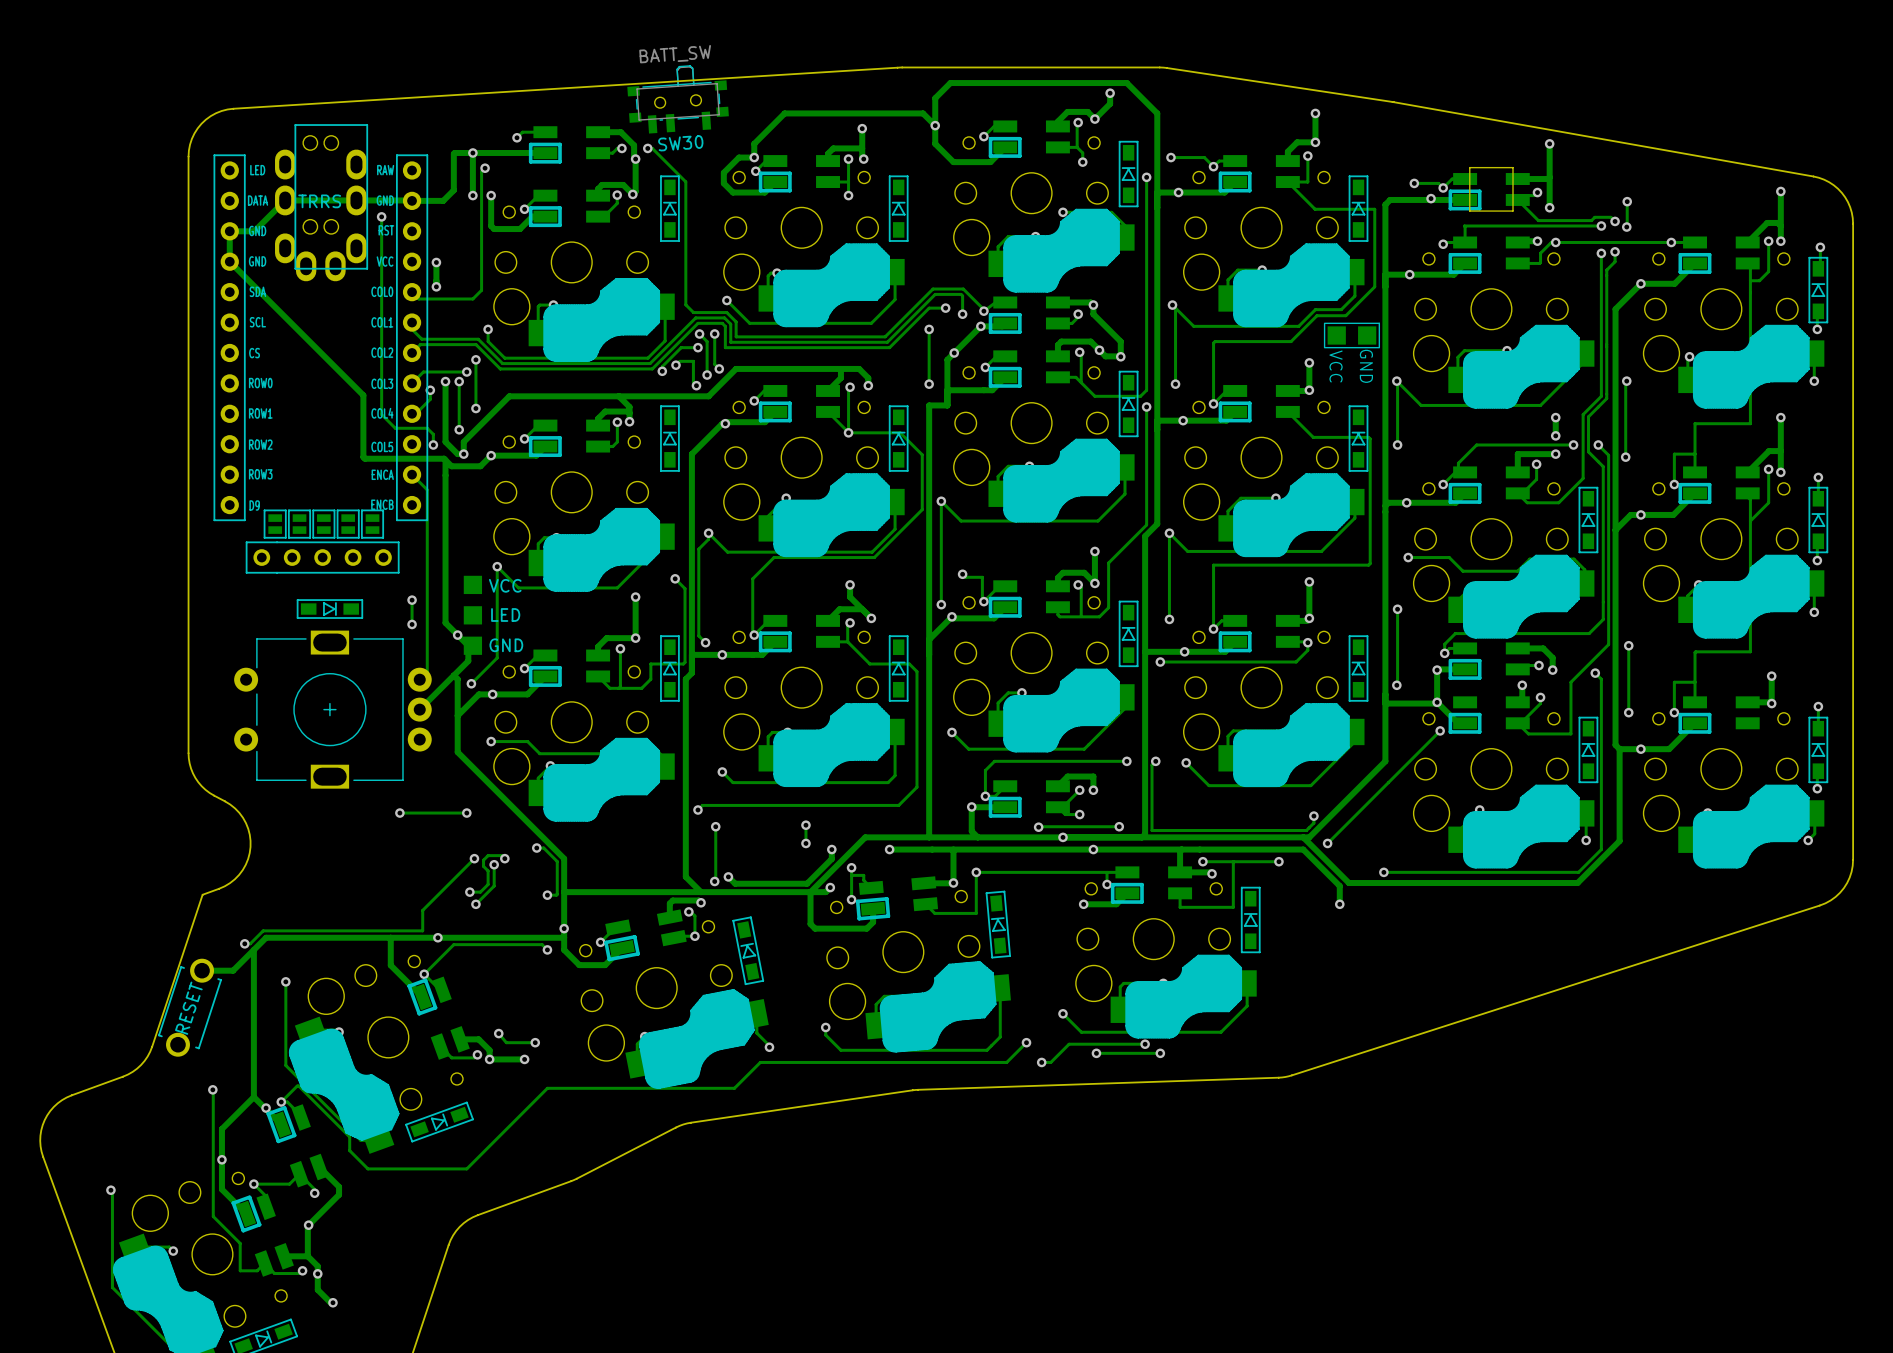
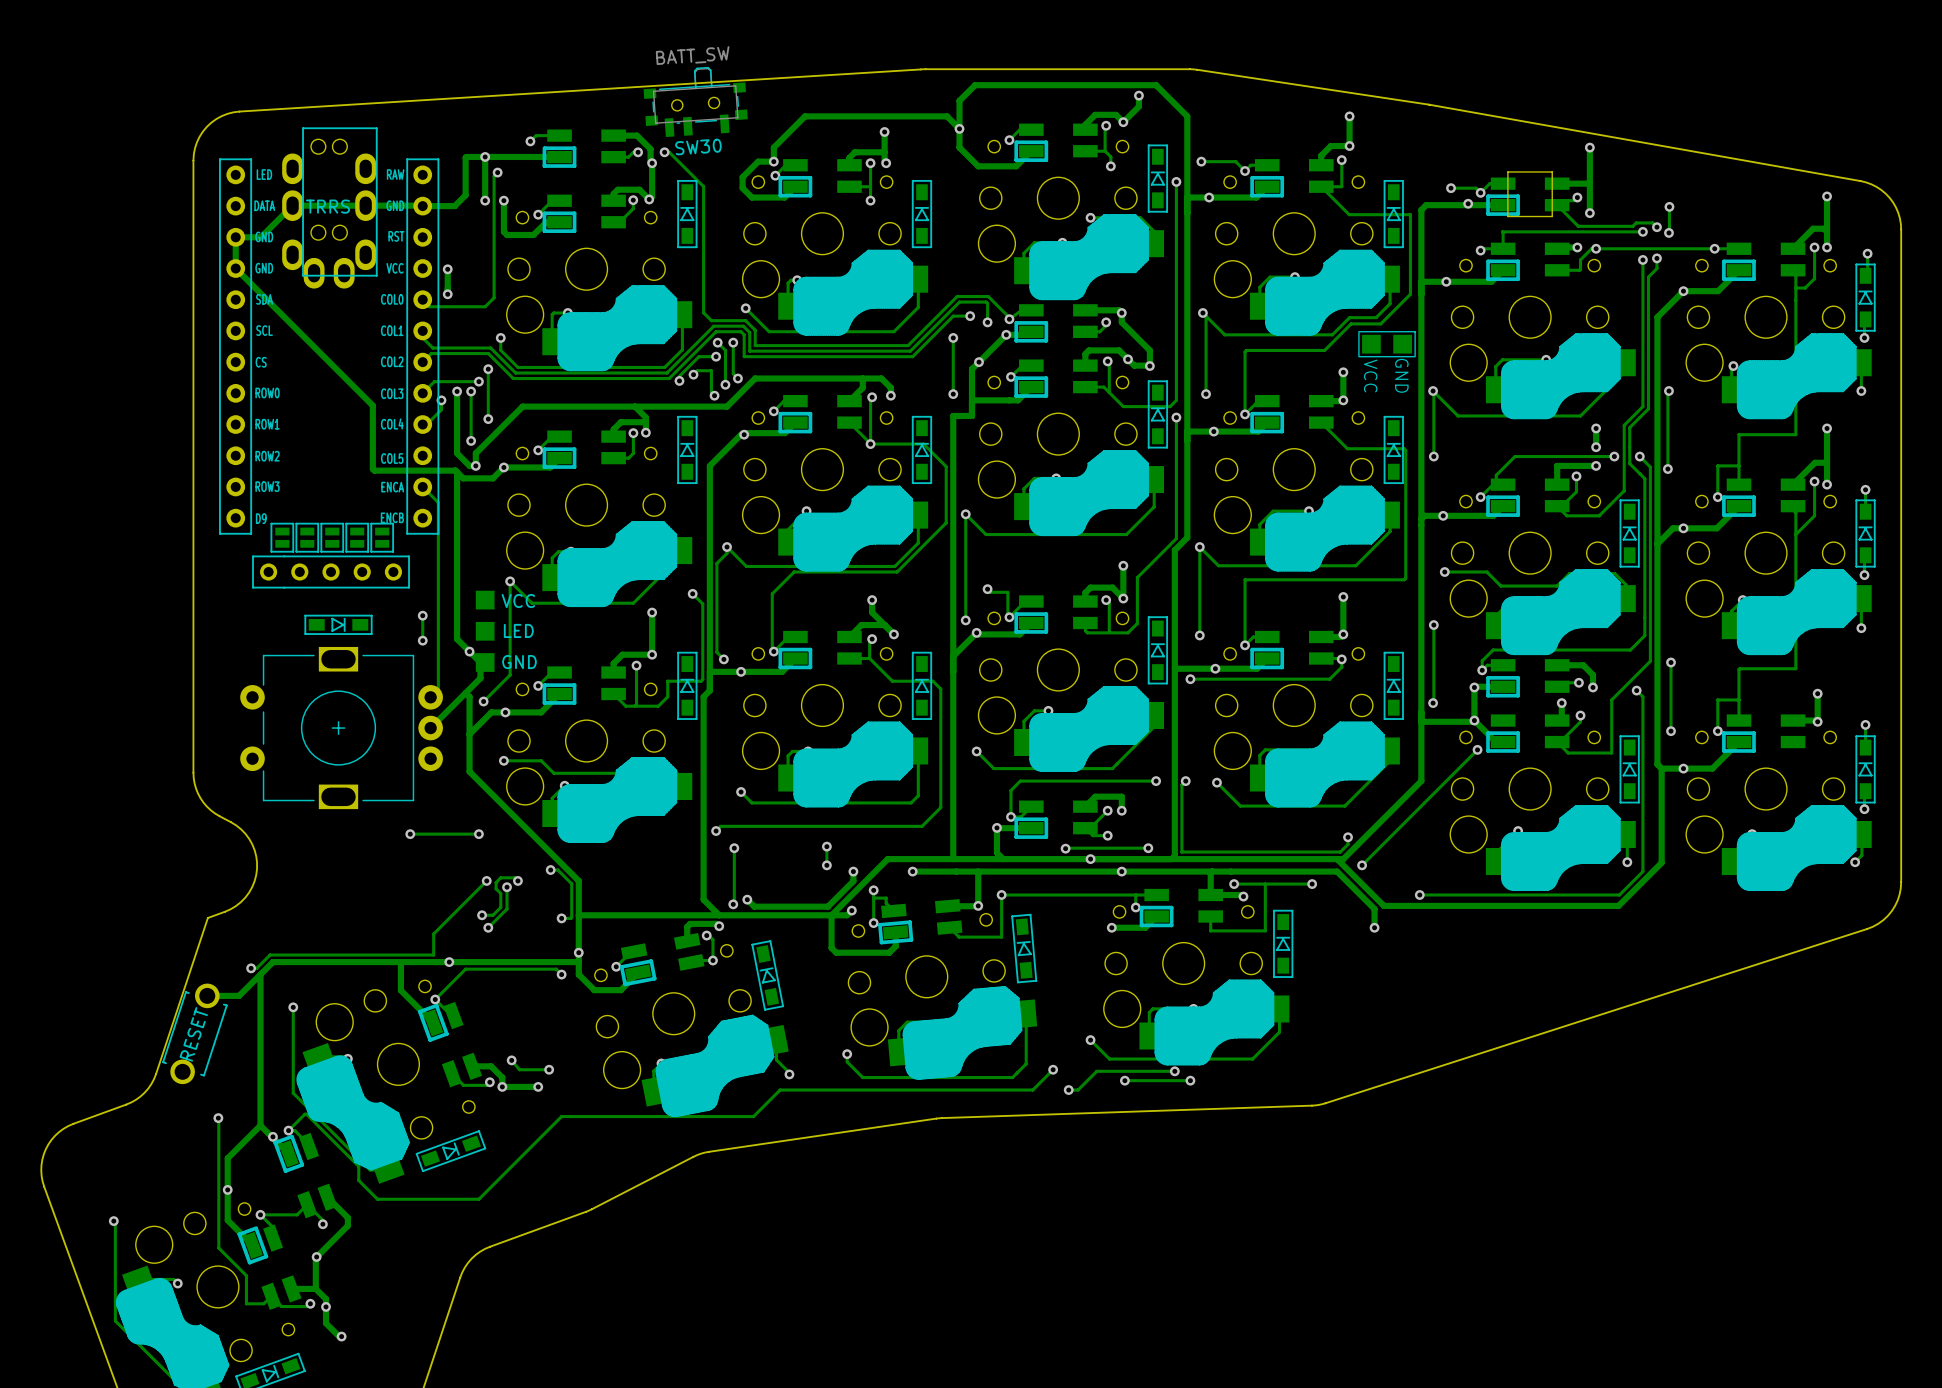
track: (381, 216) (381, 414) (395, 428) (427, 428) (433, 434) (433, 444) -> none
via: (381, 216) -> none
via: (433, 444) -> none

